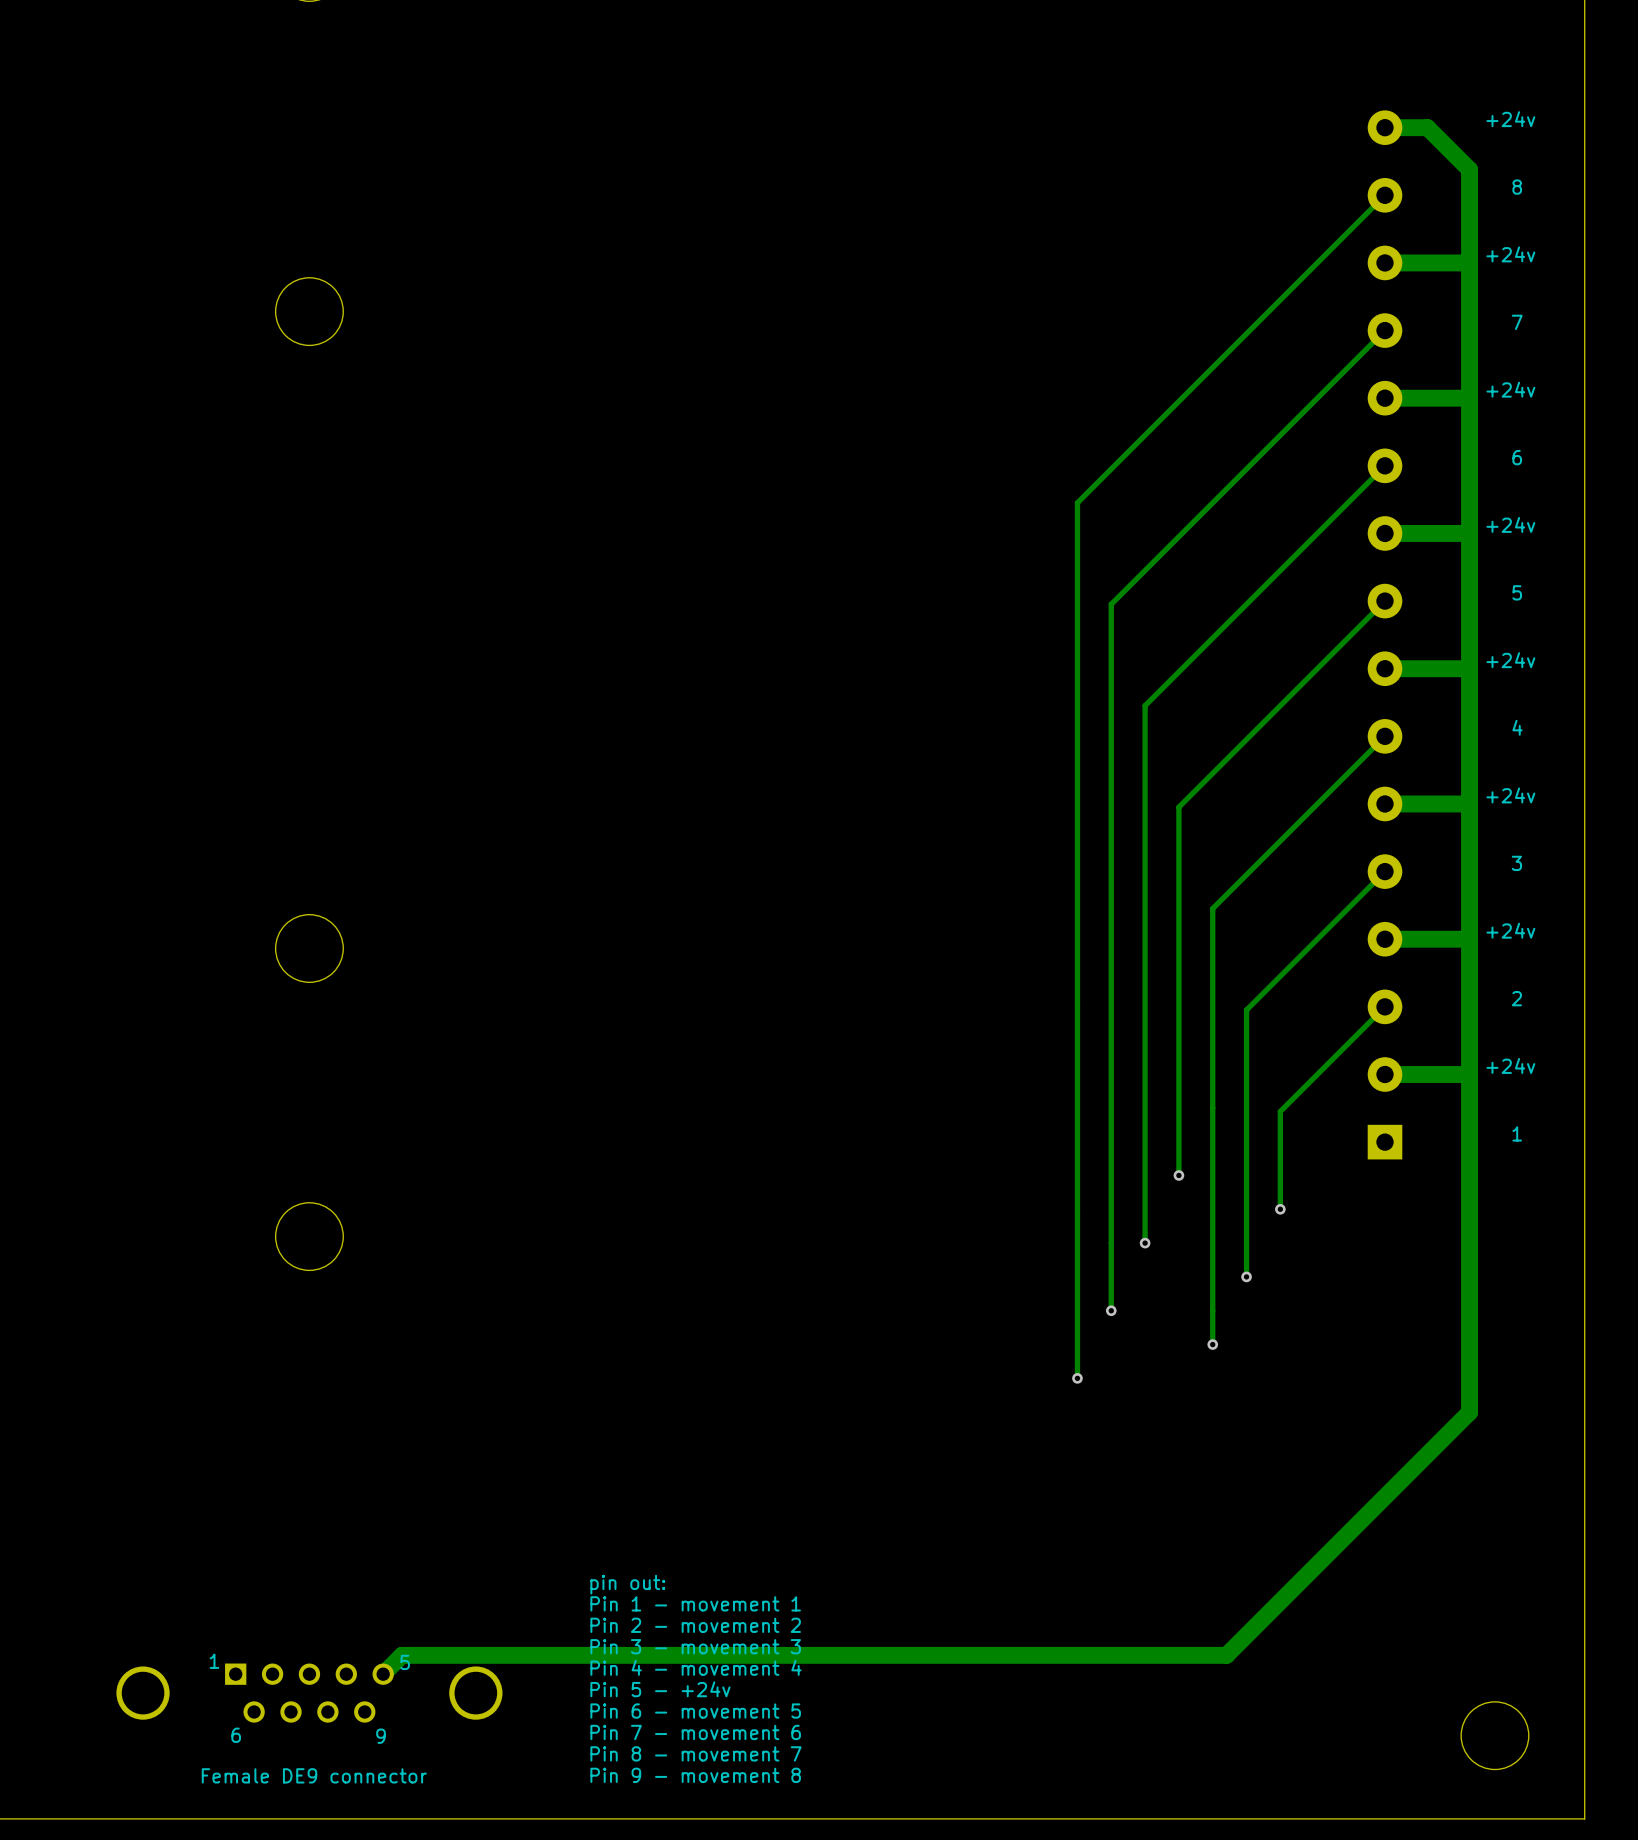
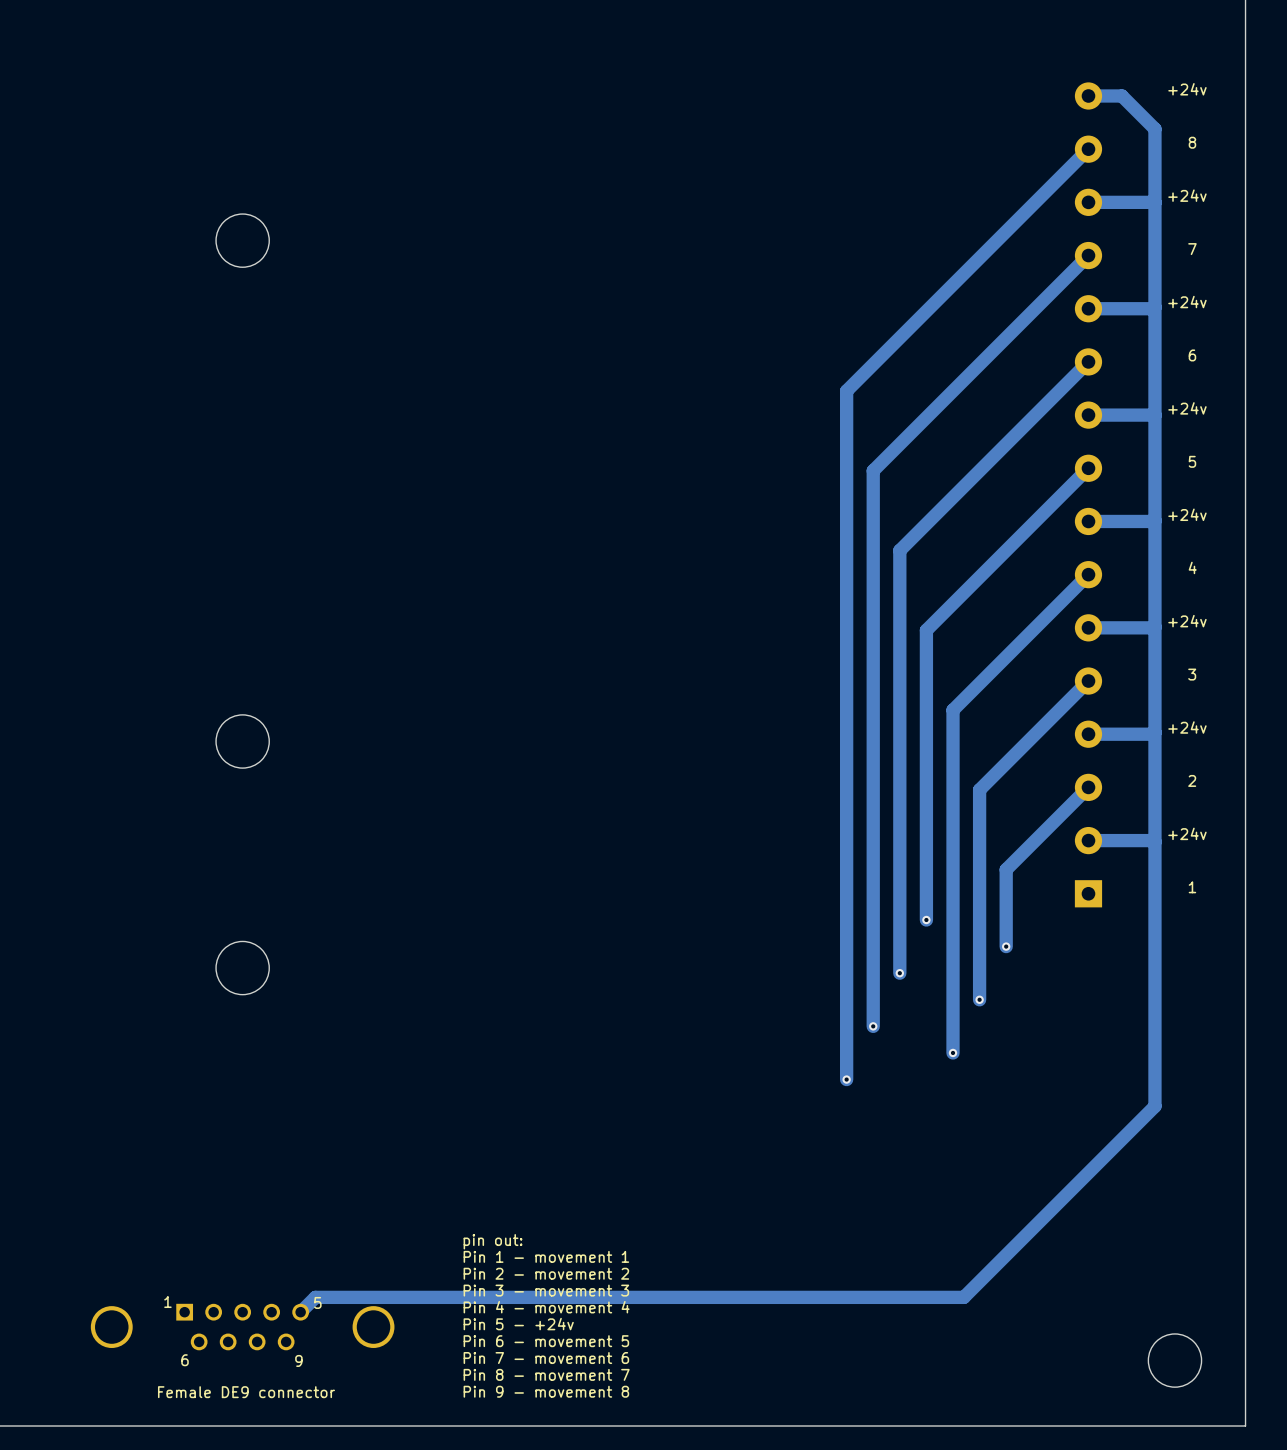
track width: thin (1385, 195) (1077, 502) (1077, 1378) -> thick (1088, 149) (846, 391) (846, 1079)
track width: thin (1385, 330) (1111, 604) (1111, 1310) -> thick (1088, 255) (873, 470) (873, 1026)
track width: thin (1385, 465) (1145, 705) (1145, 1243) -> thick (1088, 361) (899, 550) (899, 973)
track width: thin (1385, 601) (1178, 807) (1178, 1175) -> thick (1088, 468) (926, 630) (926, 920)
track width: thin (1385, 736) (1212, 908) (1212, 1344) -> thick (1088, 574) (953, 710) (953, 1052)
track width: thin (1385, 871) (1246, 1010) (1246, 1276) -> thick (1088, 681) (979, 789) (979, 999)
track width: thin (1385, 1006) (1280, 1111) (1280, 1209) -> thick (1088, 787) (1006, 869) (1006, 946)

